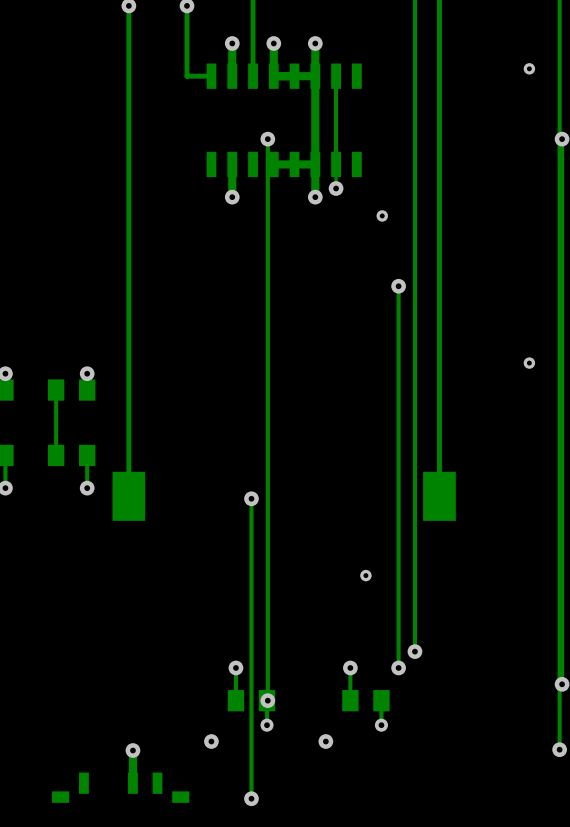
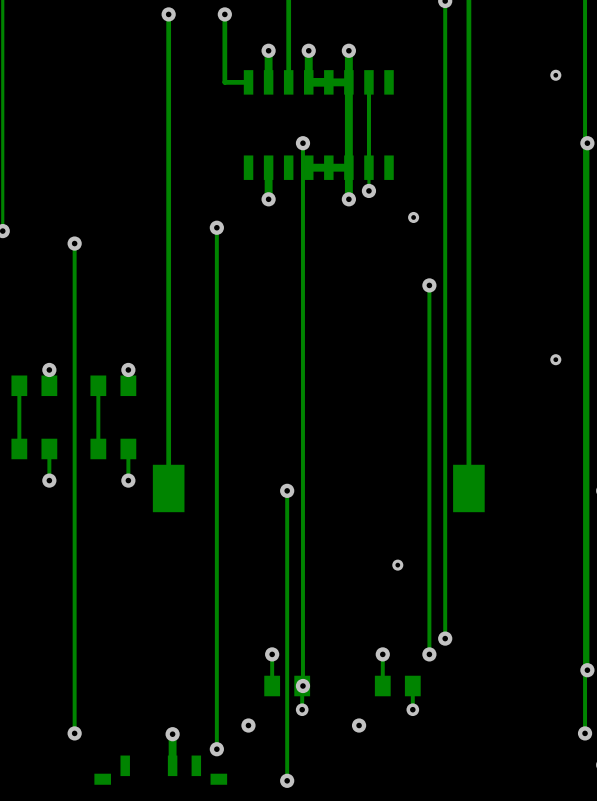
track: none -> (216, 227) (216, 749)
via: none -> (216, 227)
track: none -> (74, 243) (74, 733)
via: none -> (74, 243)
via: none -> (74, 733)
via: none -> (216, 749)

